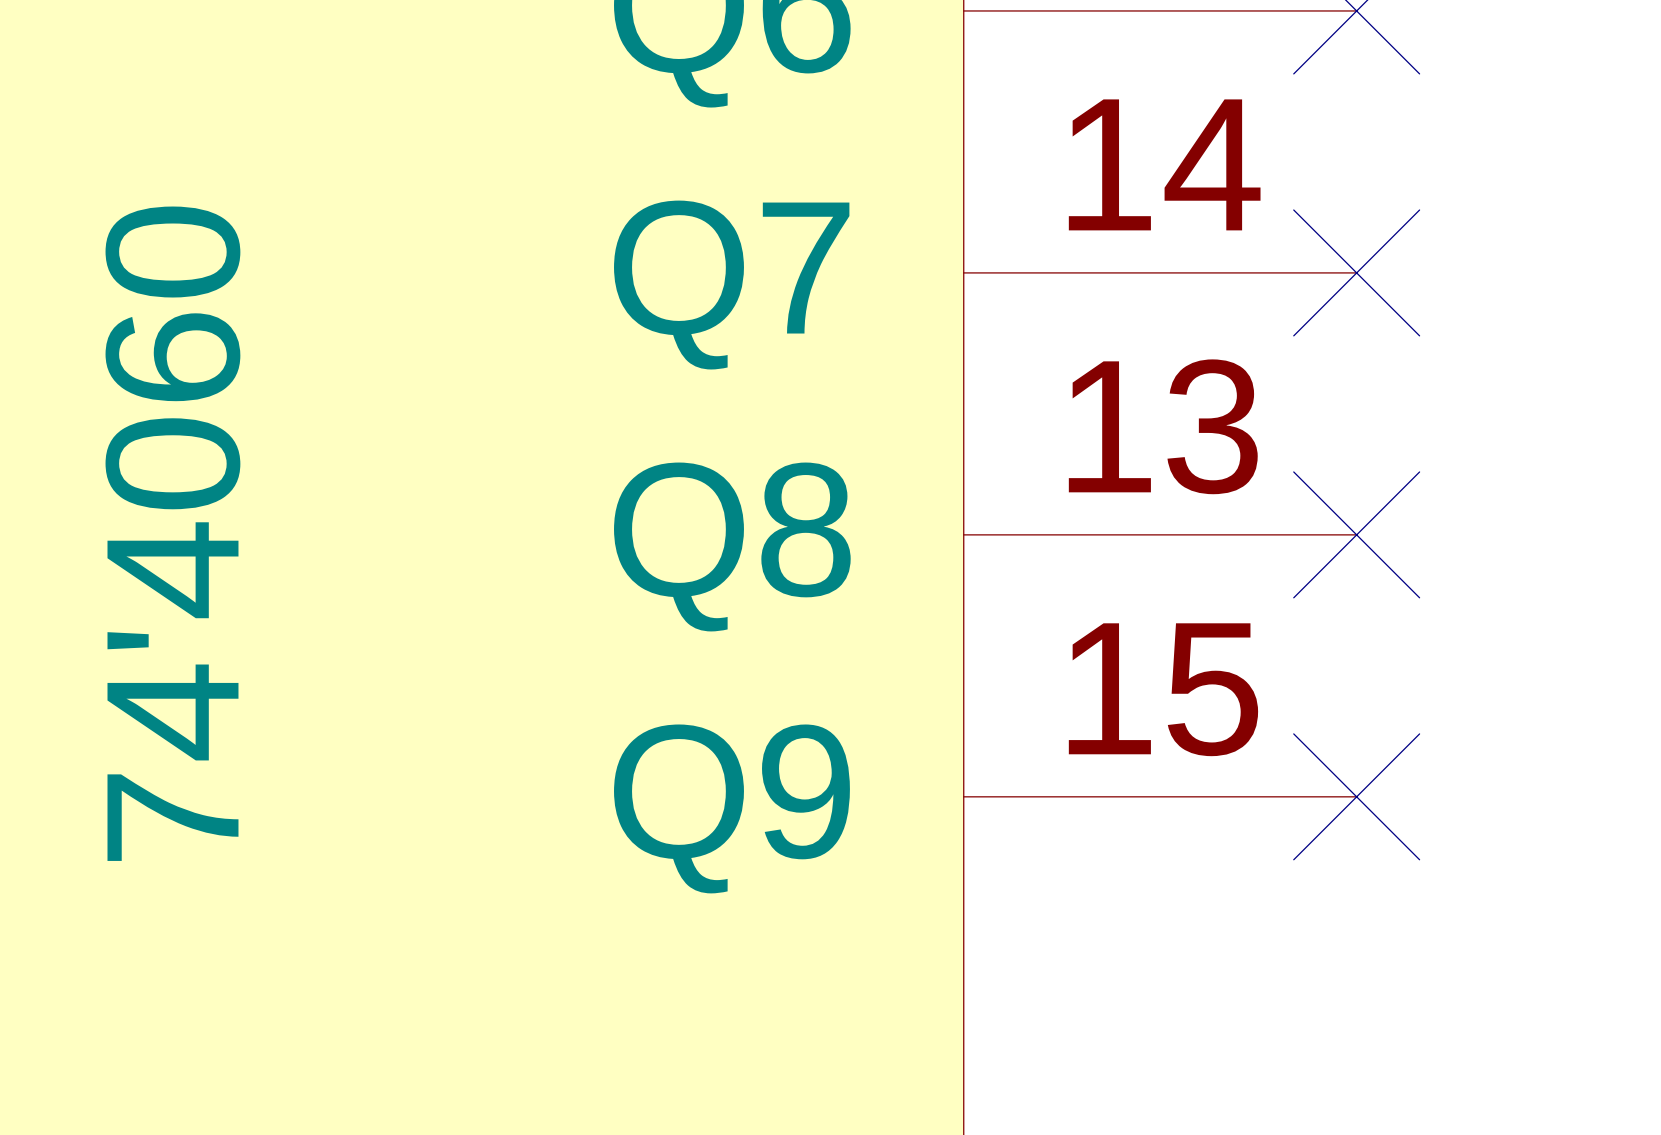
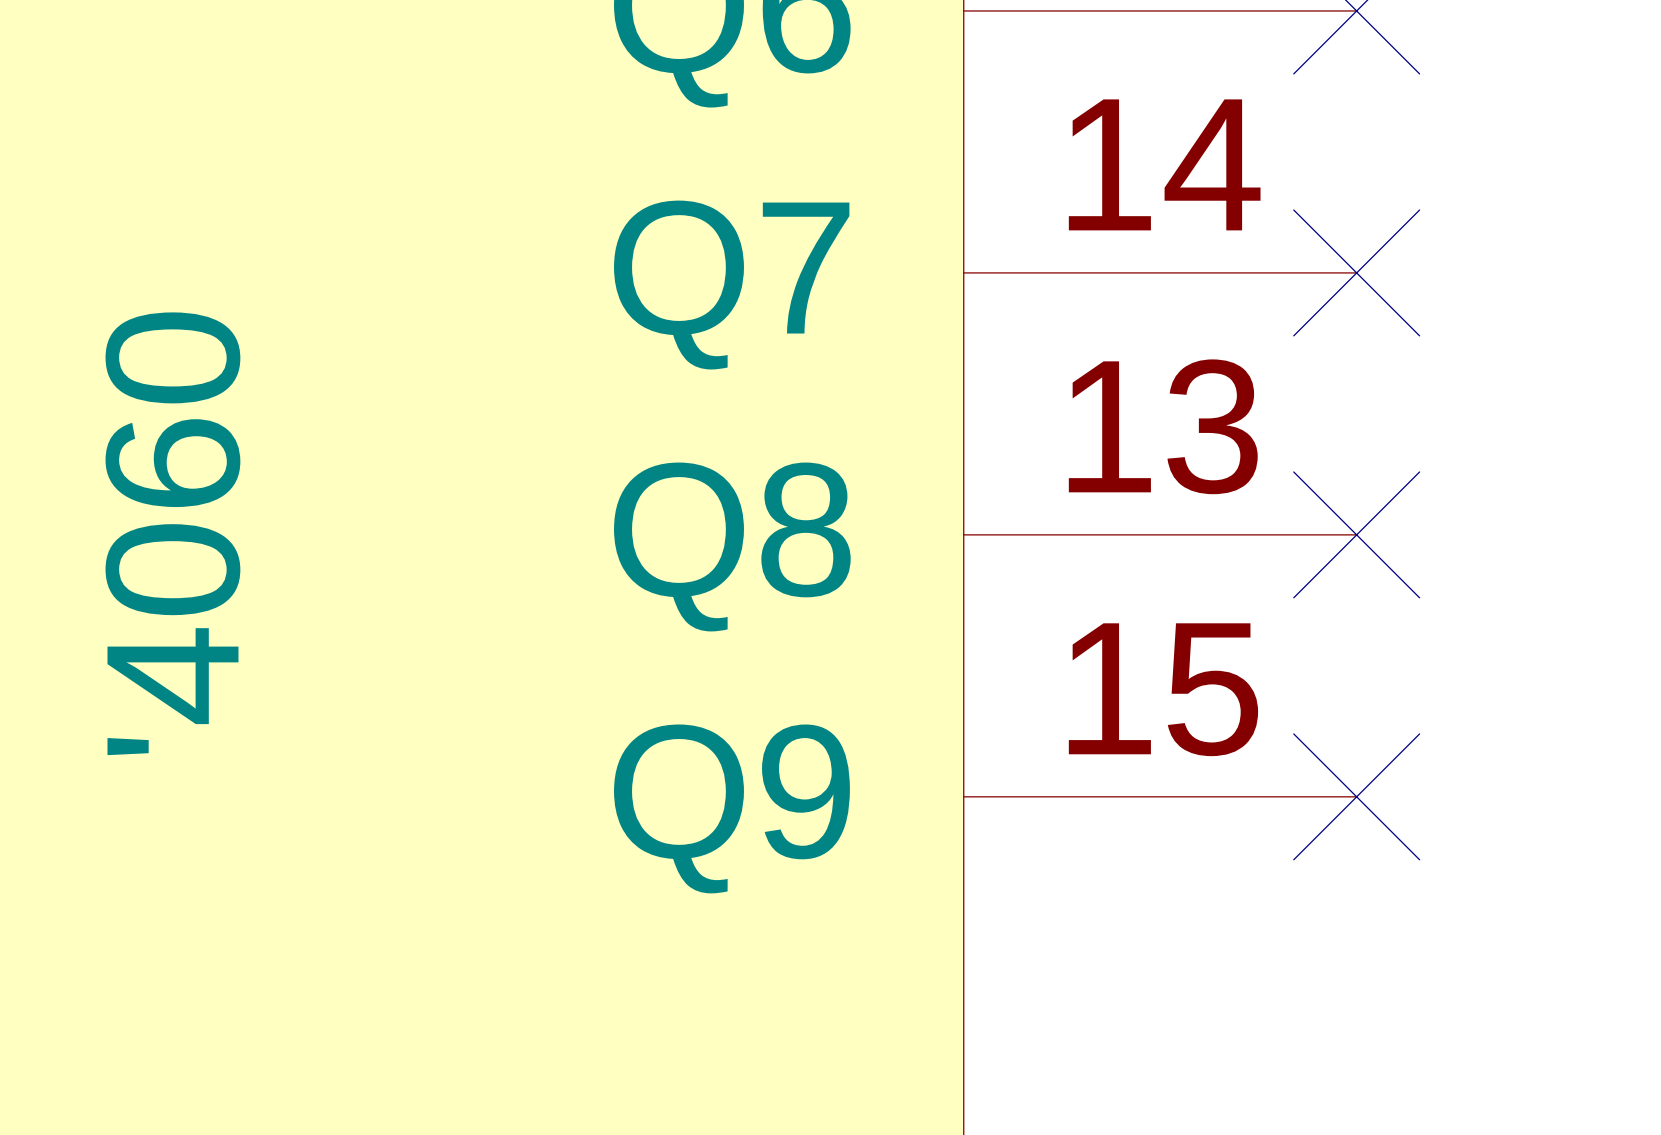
part value: 74'4060 (172, 533) -> '4060 (172, 533)

